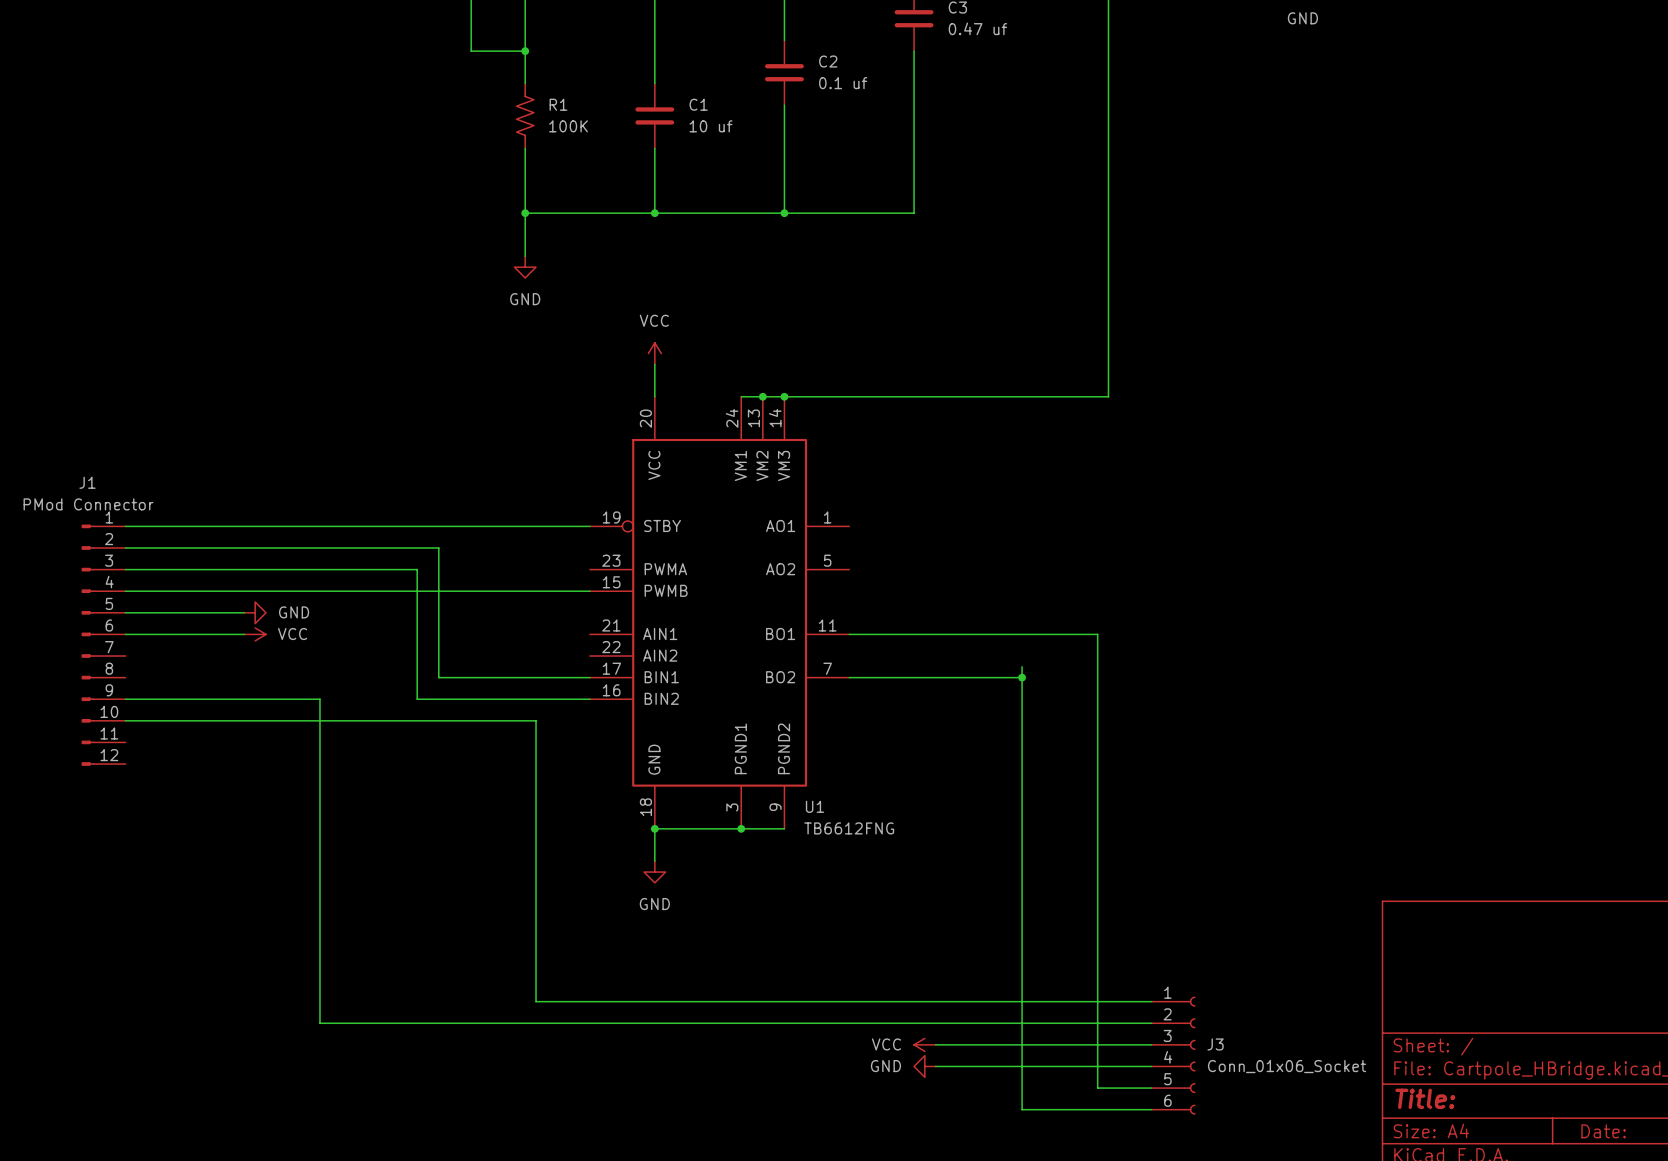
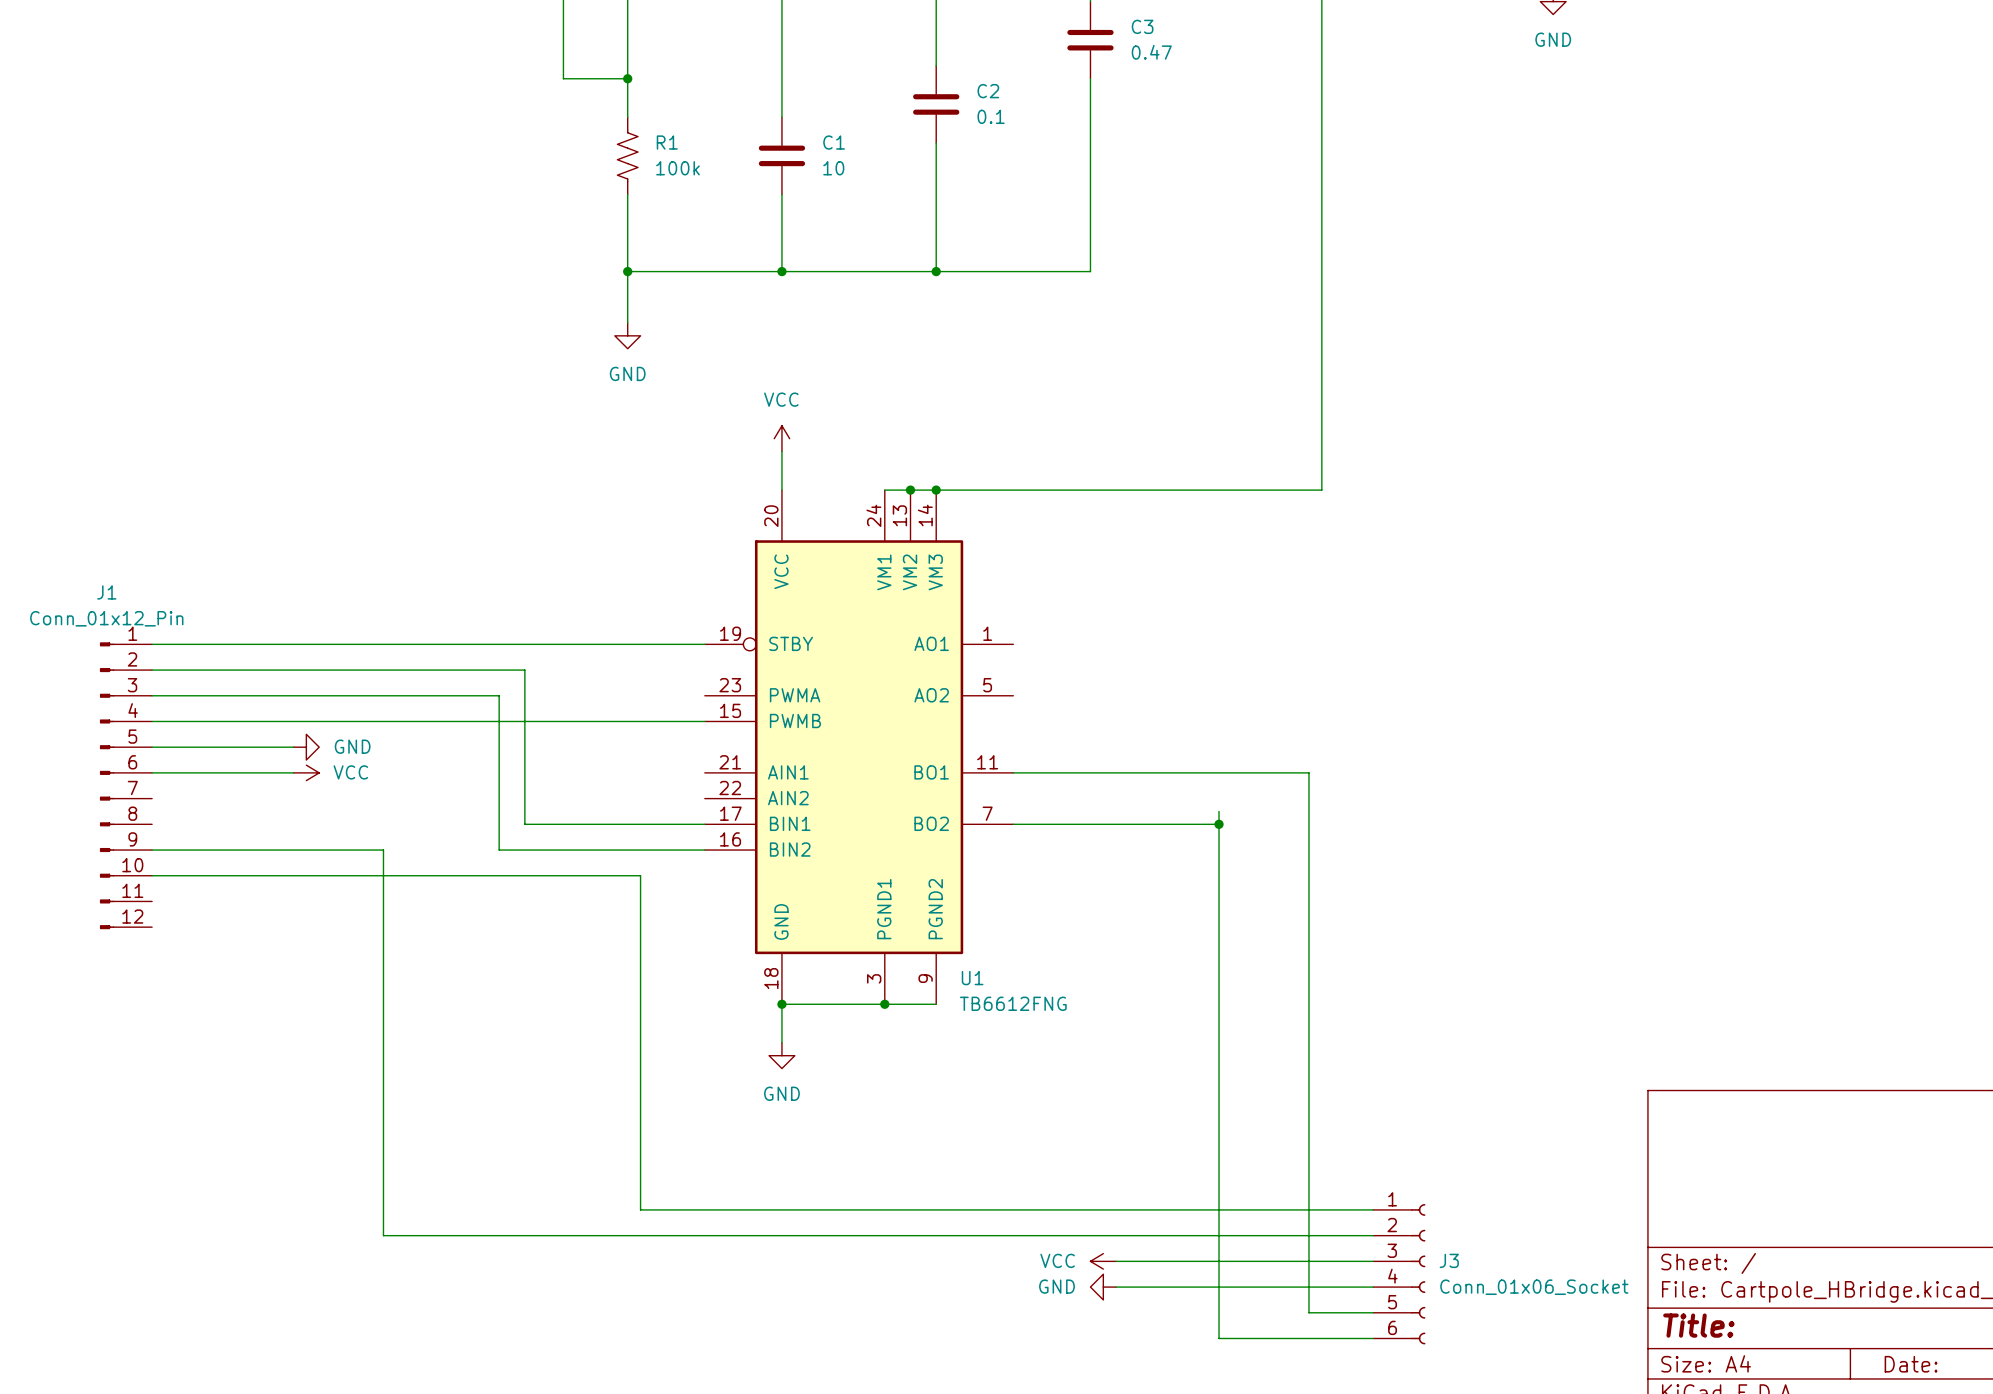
C3 value: 0.47 uf (977, 28) -> 0.47 (1151, 52)
C2 value: 0.1 uf (843, 83) -> 0.1 (991, 116)
R1 value: 100K (568, 126) -> 100k (677, 168)
C1 value: 10 uf (710, 126) -> 10 (833, 168)
J1 value: PMod Connector (88, 504) -> Conn_01x12_Pin (106, 618)

